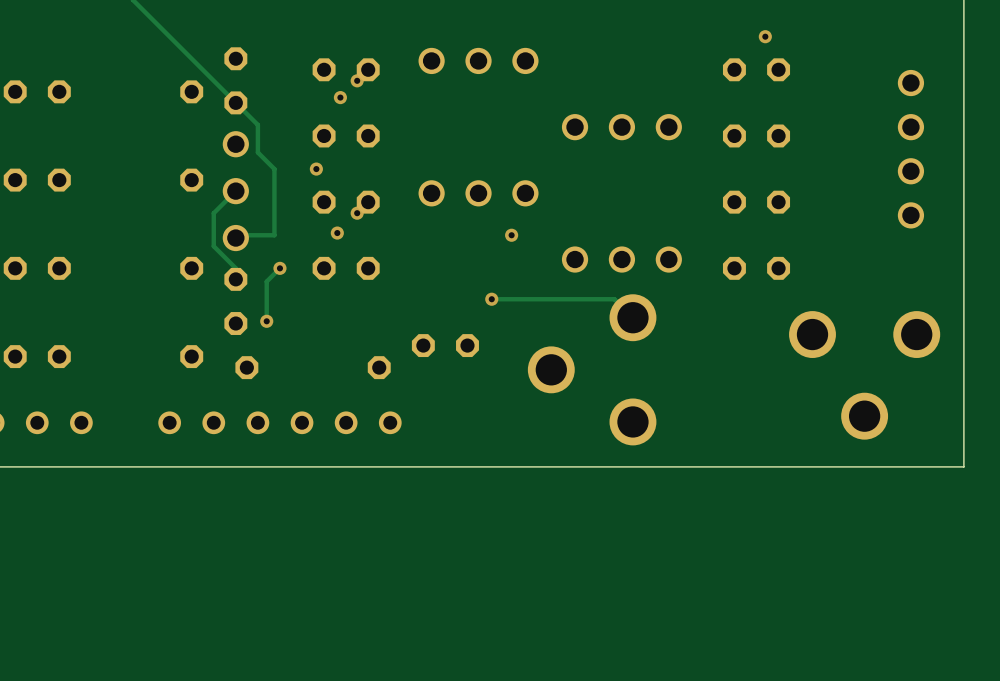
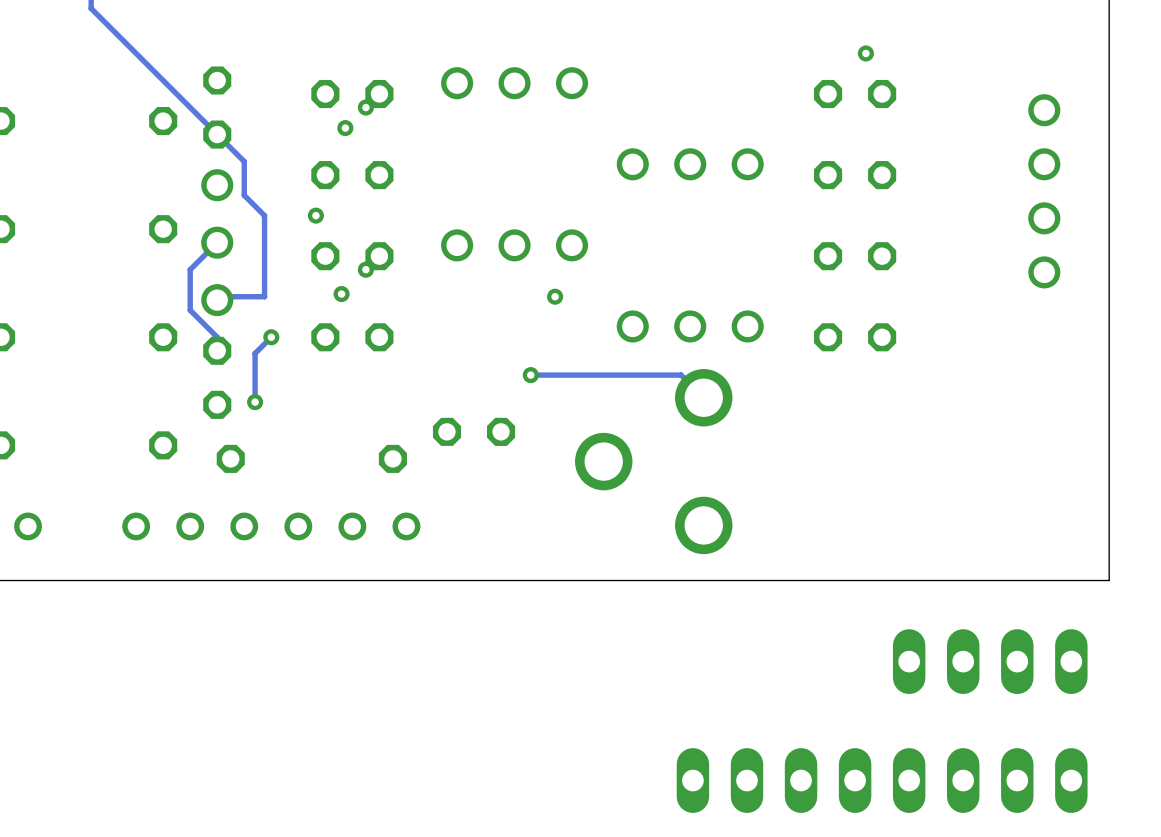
part: (864, 375) -> none
part: none -> (990, 661)
part: none -> (882, 780)

